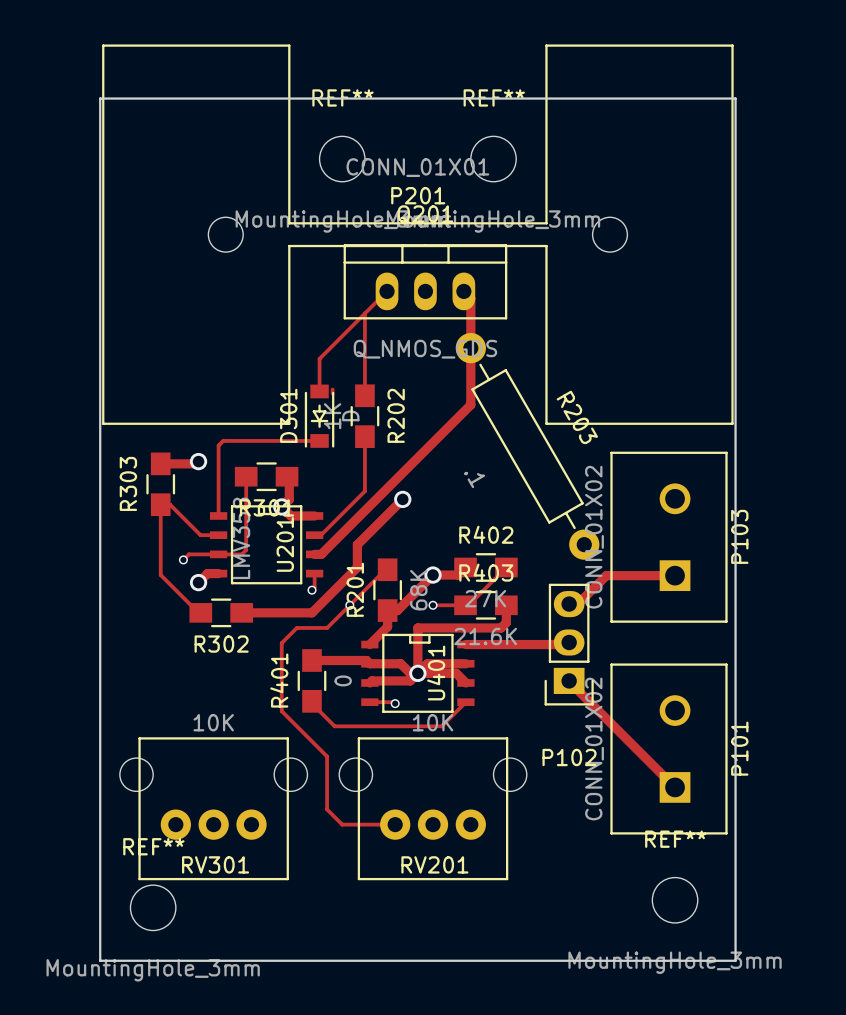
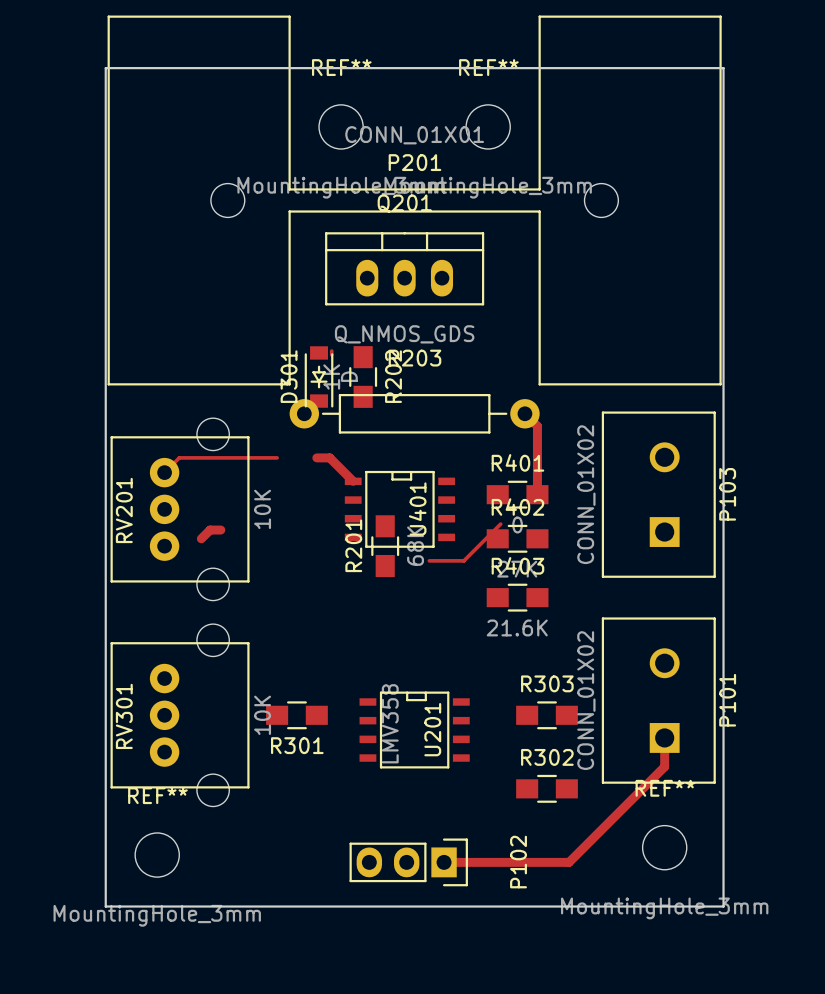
Q201 position: (425, 281) -> (404, 268)
track: (387, 291) (319, 358) (319, 391) -> none
track: (463, 291) (470, 298) (470, 404) (321, 554) (314, 554) -> none
track: (364, 313) (364, 395) -> none
track: (364, 436) (364, 491) (321, 535) (314, 535) -> none
track: (319, 440) (223, 440) (218, 445) (218, 515) -> none
R203 rotation: 0° (527, 446) -> 60° counterclockwise (414, 413)
track: none -> (524, 413) (537, 426) (537, 494)
track: (198, 461) (196, 463) (160, 463) -> none
via: (198, 461) -> none
track: (246, 476) (246, 550) (241, 554) (188, 554) (183, 559) -> none
R301 position: (266, 476) -> (296, 715)
track: (287, 476) (289, 478) (289, 499) (281, 506) (290, 515) (314, 515) -> none
R203 value: .1 (474, 479) -> none
R303 rotation: 0° (160, 484) -> 90° clockwise (547, 715)
R303 position: (160, 484) -> (547, 715)
track: none -> (277, 457) (179, 457) (164, 472)
track: none -> (316, 457) (329, 457) (353, 481)
track: (402, 499) (357, 544) (357, 567) (312, 612) (241, 612) -> none
via: (402, 499) -> none
via: (281, 506) -> none
track: (218, 535) (200, 535) (170, 504) (160, 504) (160, 575) (198, 612) (200, 612) -> none
U201 position: (266, 544) -> (414, 730)
via: (183, 559) -> none
track: (465, 567) (457, 575) (433, 575) (397, 610) (387, 610) (387, 626) (369, 644) -> none
R402 position: (485, 567) -> (517, 538)
track: (387, 569) (385, 569) (327, 627) (296, 627) (281, 643) (281, 711) (327, 756) (327, 809) (342, 824) (395, 824) -> none
track: (314, 573) (314, 587) (312, 590) -> none
via: (433, 575) -> none
track: (675, 575) (606, 575) (577, 604) (569, 604) -> none
via: (198, 582) -> none
via: (312, 590) -> none
via: (349, 605) -> none
via: (433, 605) -> none
R403 position: (485, 605) -> (517, 597)
track: (506, 605) (506, 622) (501, 627) (417, 627) (417, 673) -> none
R302 position: (221, 612) -> (547, 788)
track: (569, 642) (567, 644) (465, 644) -> none
R302 name position: R302 (221, 644) -> R302 (547, 757)
P102 rotation: 0° (569, 644) -> 90° counterclockwise (408, 862)
P102 position: (569, 644) -> (408, 862)
track: (312, 660) (366, 660) (369, 663) (400, 663) (410, 673) (456, 673) (465, 682) -> none
track: (465, 663) (427, 663) (410, 680) (371, 680) (369, 682) -> none
U401 position: (417, 673) -> (399, 509)
via: (417, 673) -> none
R401 rotation: 0° (312, 680) -> 90° clockwise (517, 494)
R401 position: (312, 680) -> (517, 494)
track: (569, 680) (675, 787) -> (444, 862) (569, 862) (664, 766) (664, 737)
track: (312, 701) (312, 703) (334, 726) (441, 726) (465, 702) -> none
track: (369, 702) (395, 703) -> none
via: (395, 703) -> none
RV301 rotation: 0° (213, 808) -> 90° clockwise (180, 715)
RV201 rotation: 0° (433, 808) -> 90° clockwise (180, 509)
RV201 position: (433, 808) -> (180, 509)

